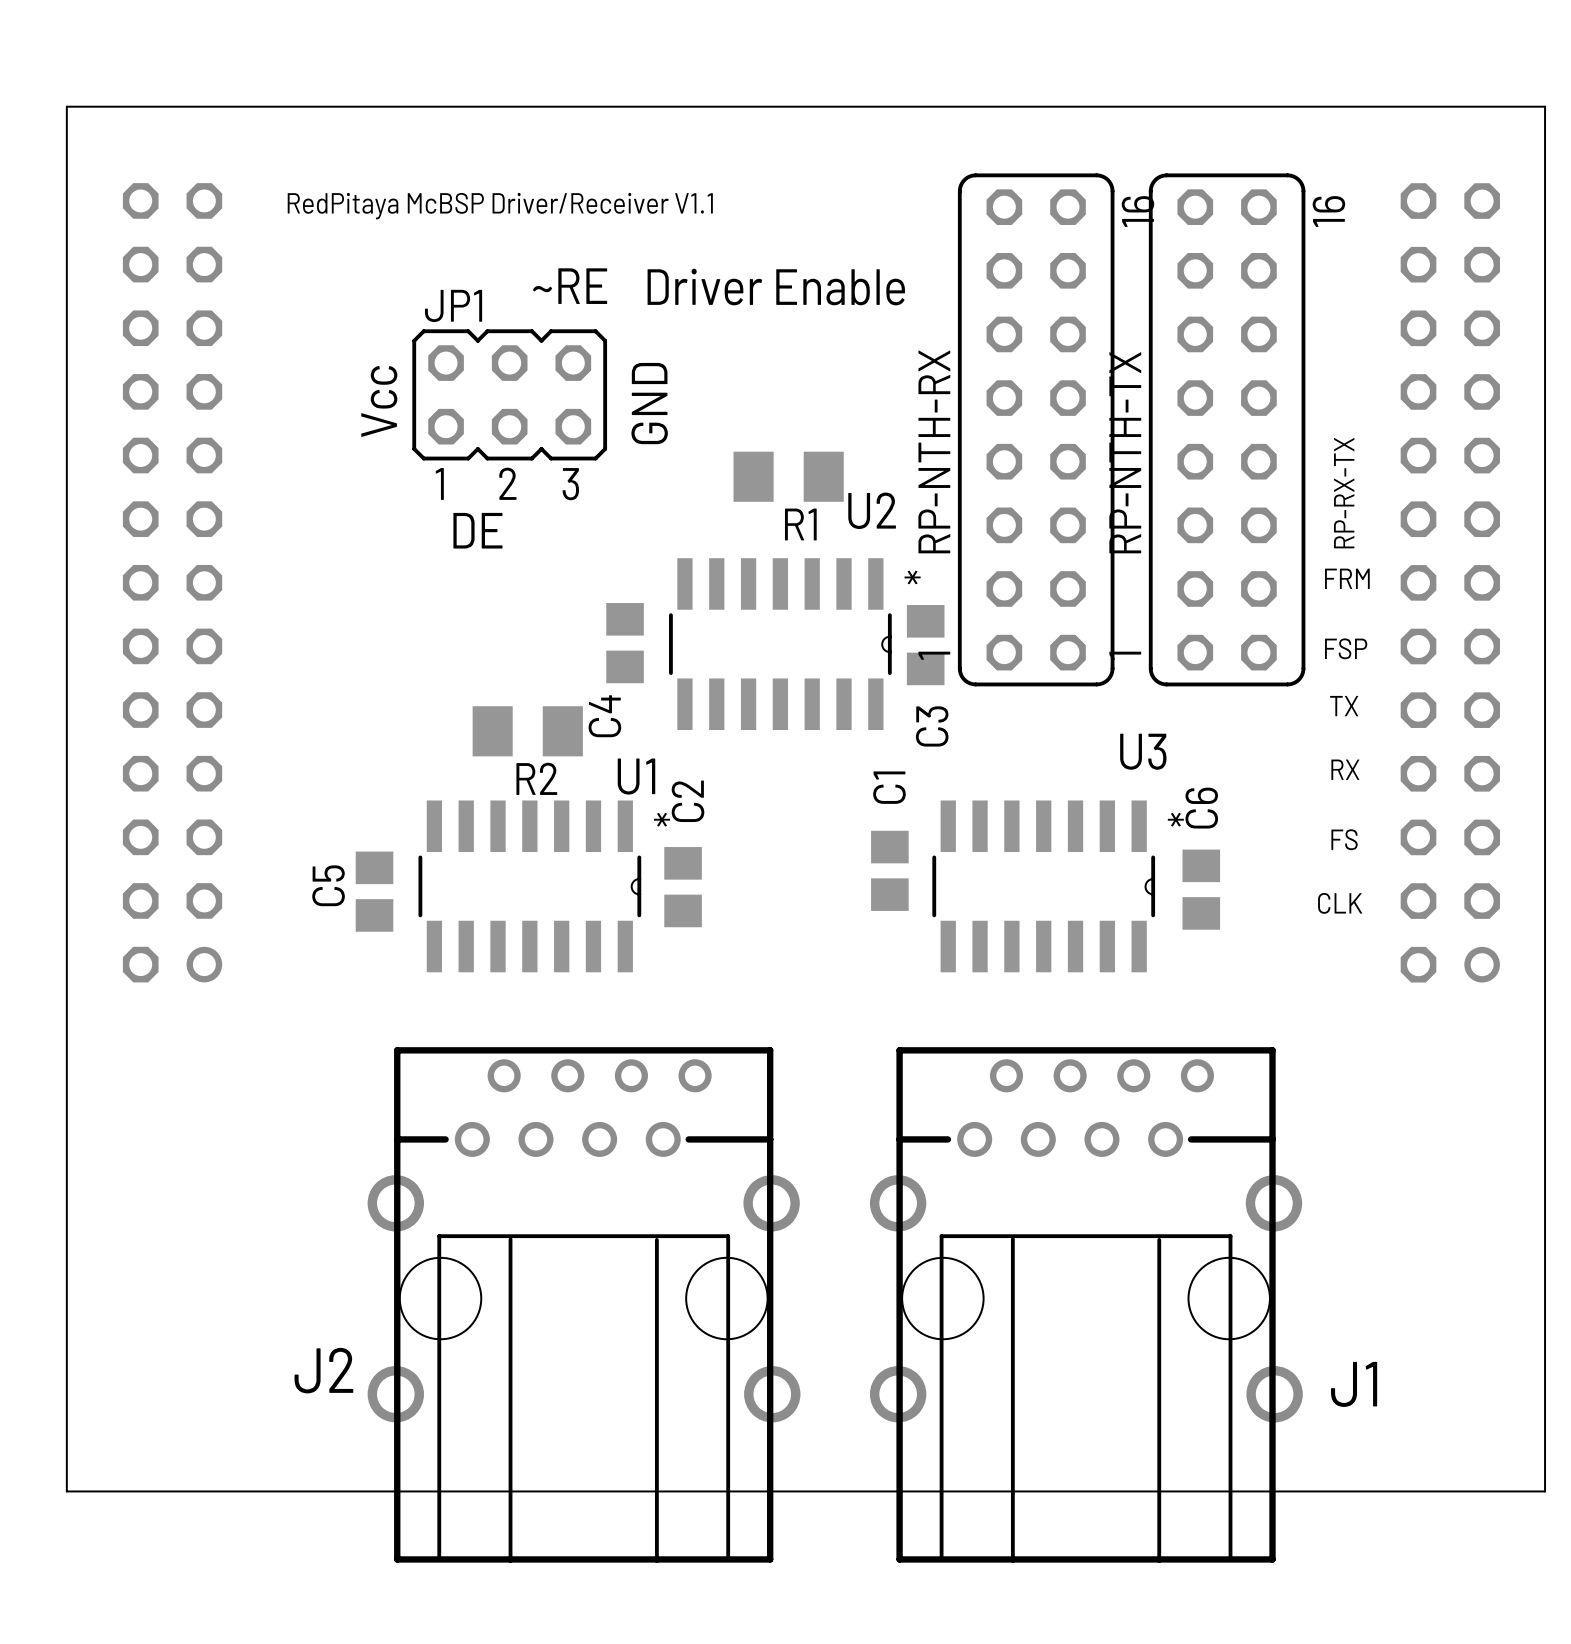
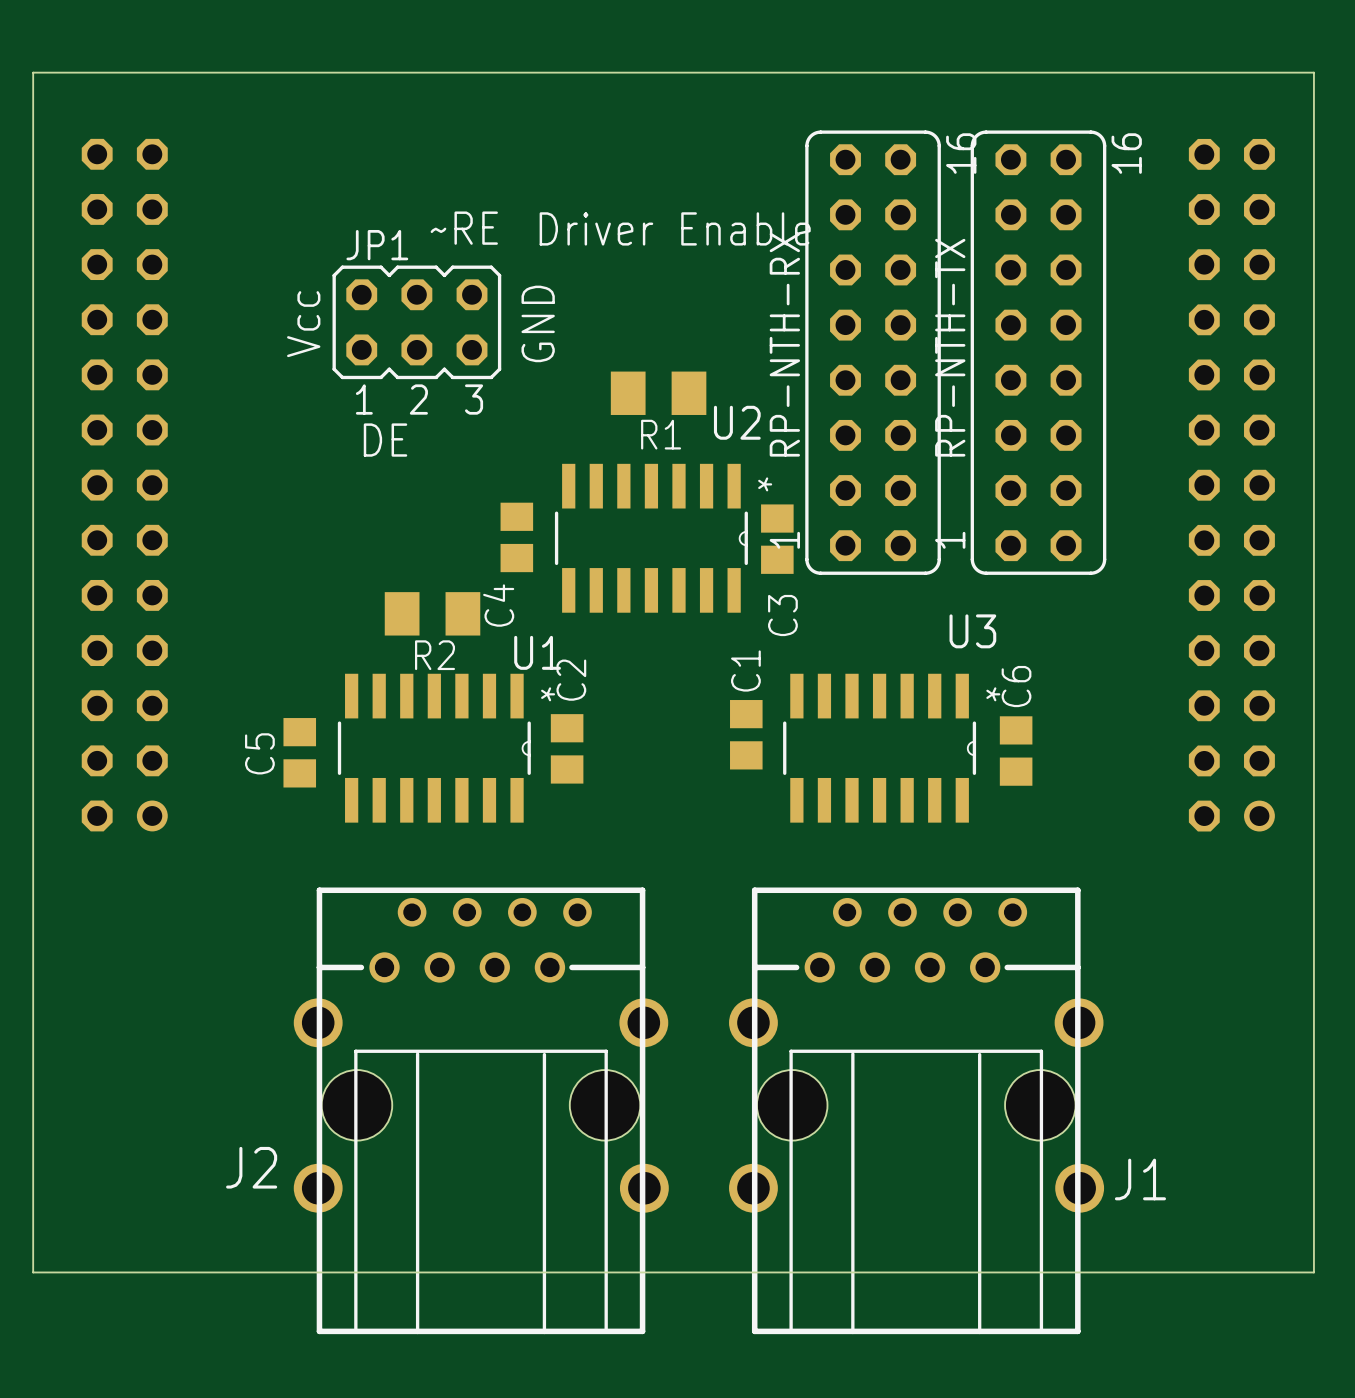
text: RedPitaya McBSP Driver/Receiver V1.1 (500, 206) -> none
text: RP-RX-TX (1344, 493) -> none
text: FRM (1347, 578) -> none
text: FSP (1346, 648) -> none
text: TX (1344, 706) -> none
text: RX (1345, 769) -> none
text: FS (1344, 839) -> none
text: CLK (1340, 903) -> none

